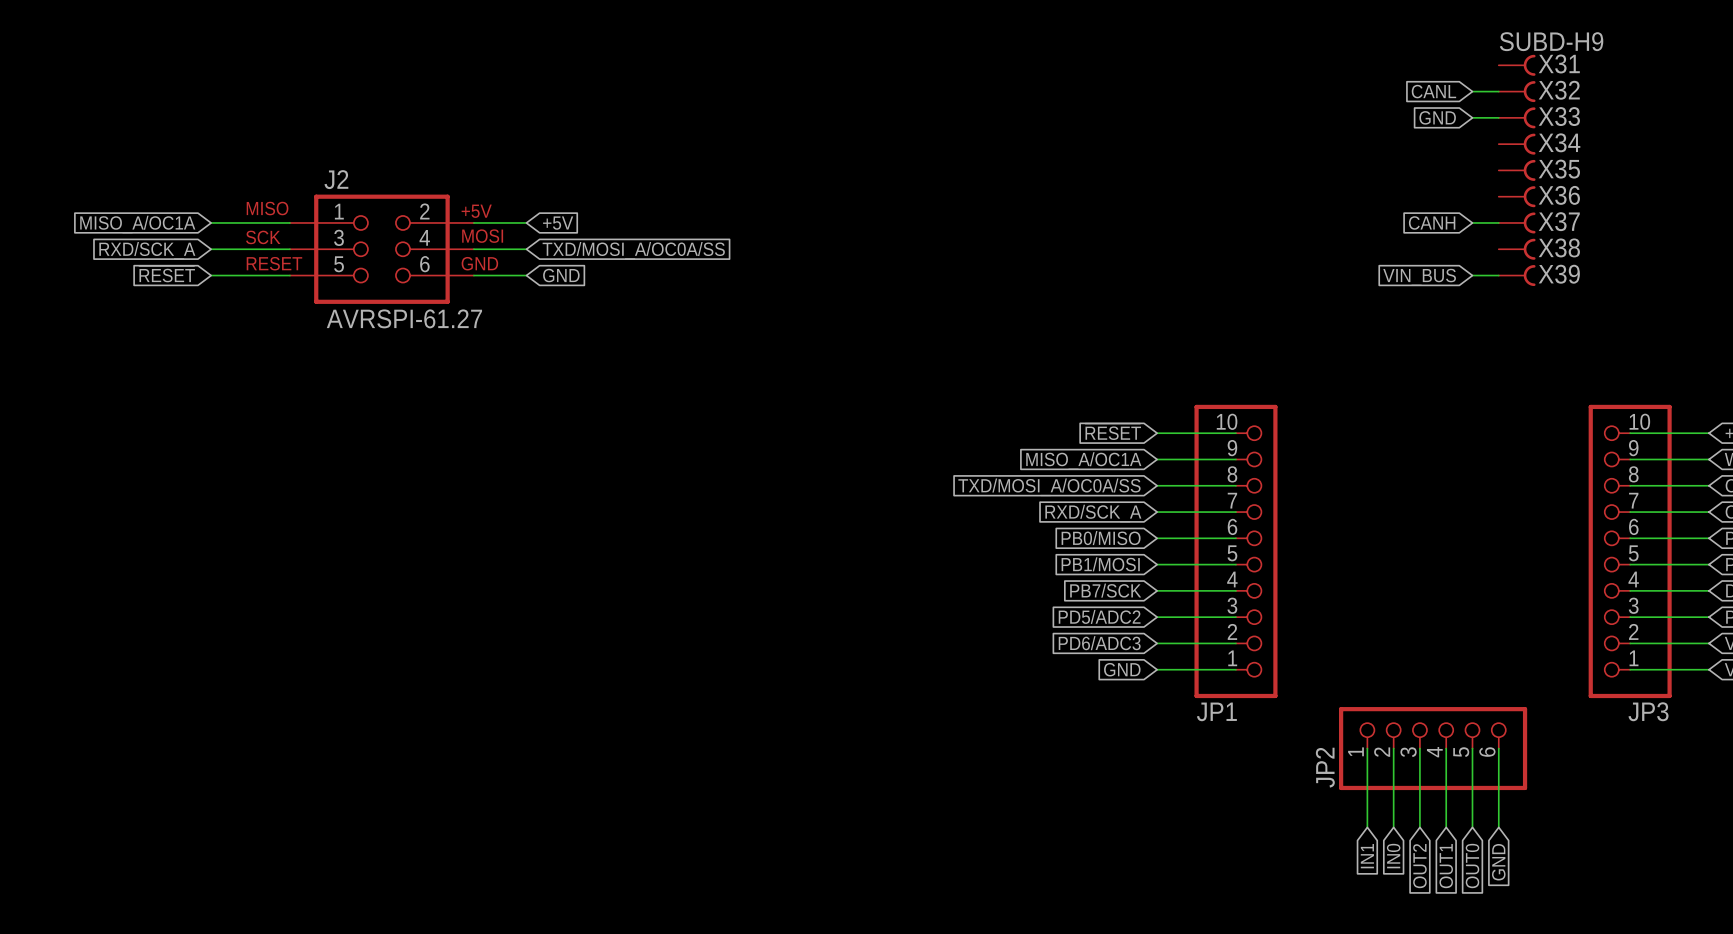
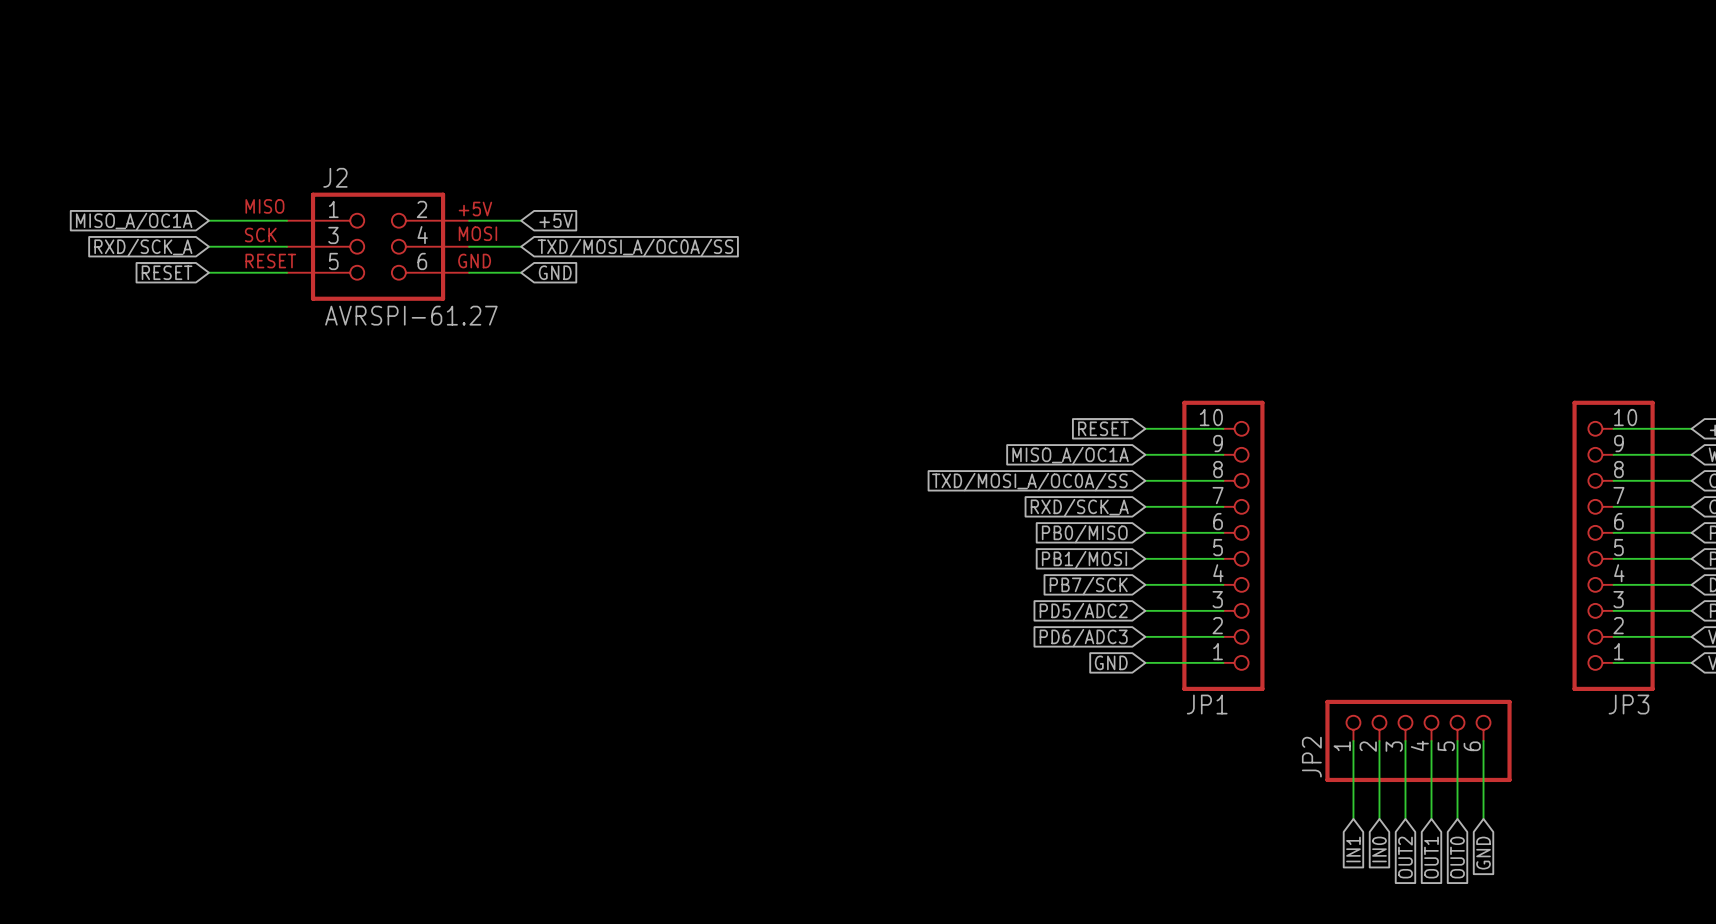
X31: SUBD-H9 (1517, 65) -> none
global label: CANL (1433, 91) -> none
wire: (1472, 91) (1498, 91) -> none
X32: (1517, 91) -> none
global label: GND (1437, 117) -> none
wire: (1472, 117) (1498, 117) -> none
X33: (1517, 117) -> none
X34: (1517, 144) -> none
X35: (1517, 170) -> none
X36: (1517, 196) -> none
global label: CANH (1432, 222) -> none
wire: (1472, 222) (1498, 222) -> none
X37: (1517, 222) -> none
X38: (1517, 249) -> none
wire: (1472, 275) (1498, 275) -> none
X39: (1517, 275) -> none
global label: VIN_BUS (1419, 277) -> none

